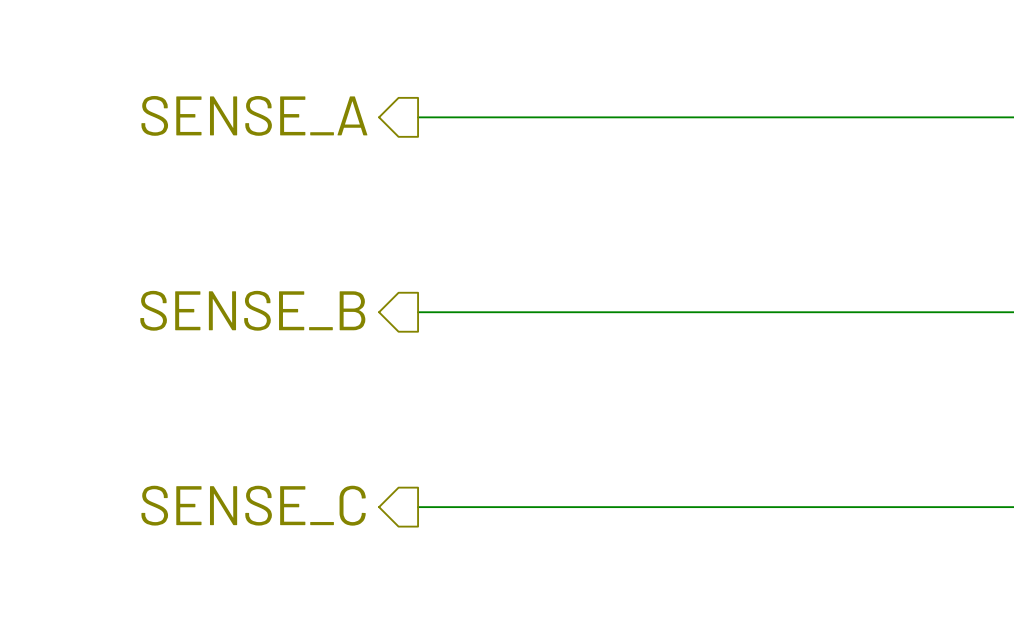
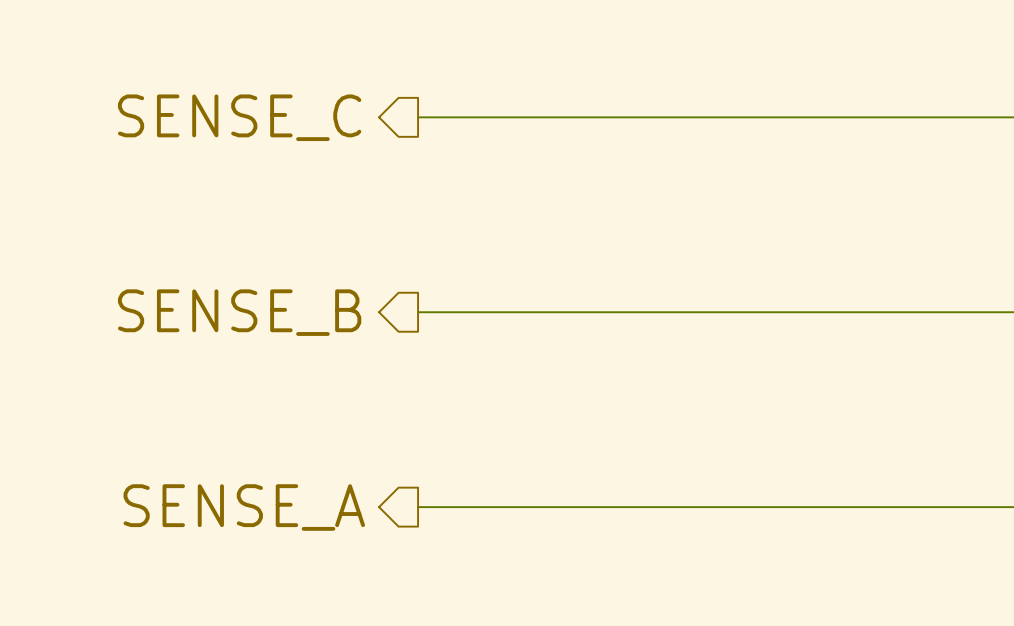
hierarchical label: SENSE_A (254, 115) -> SENSE_C (239, 117)
hierarchical label: SENSE_C (253, 505) -> SENSE_A (244, 507)

